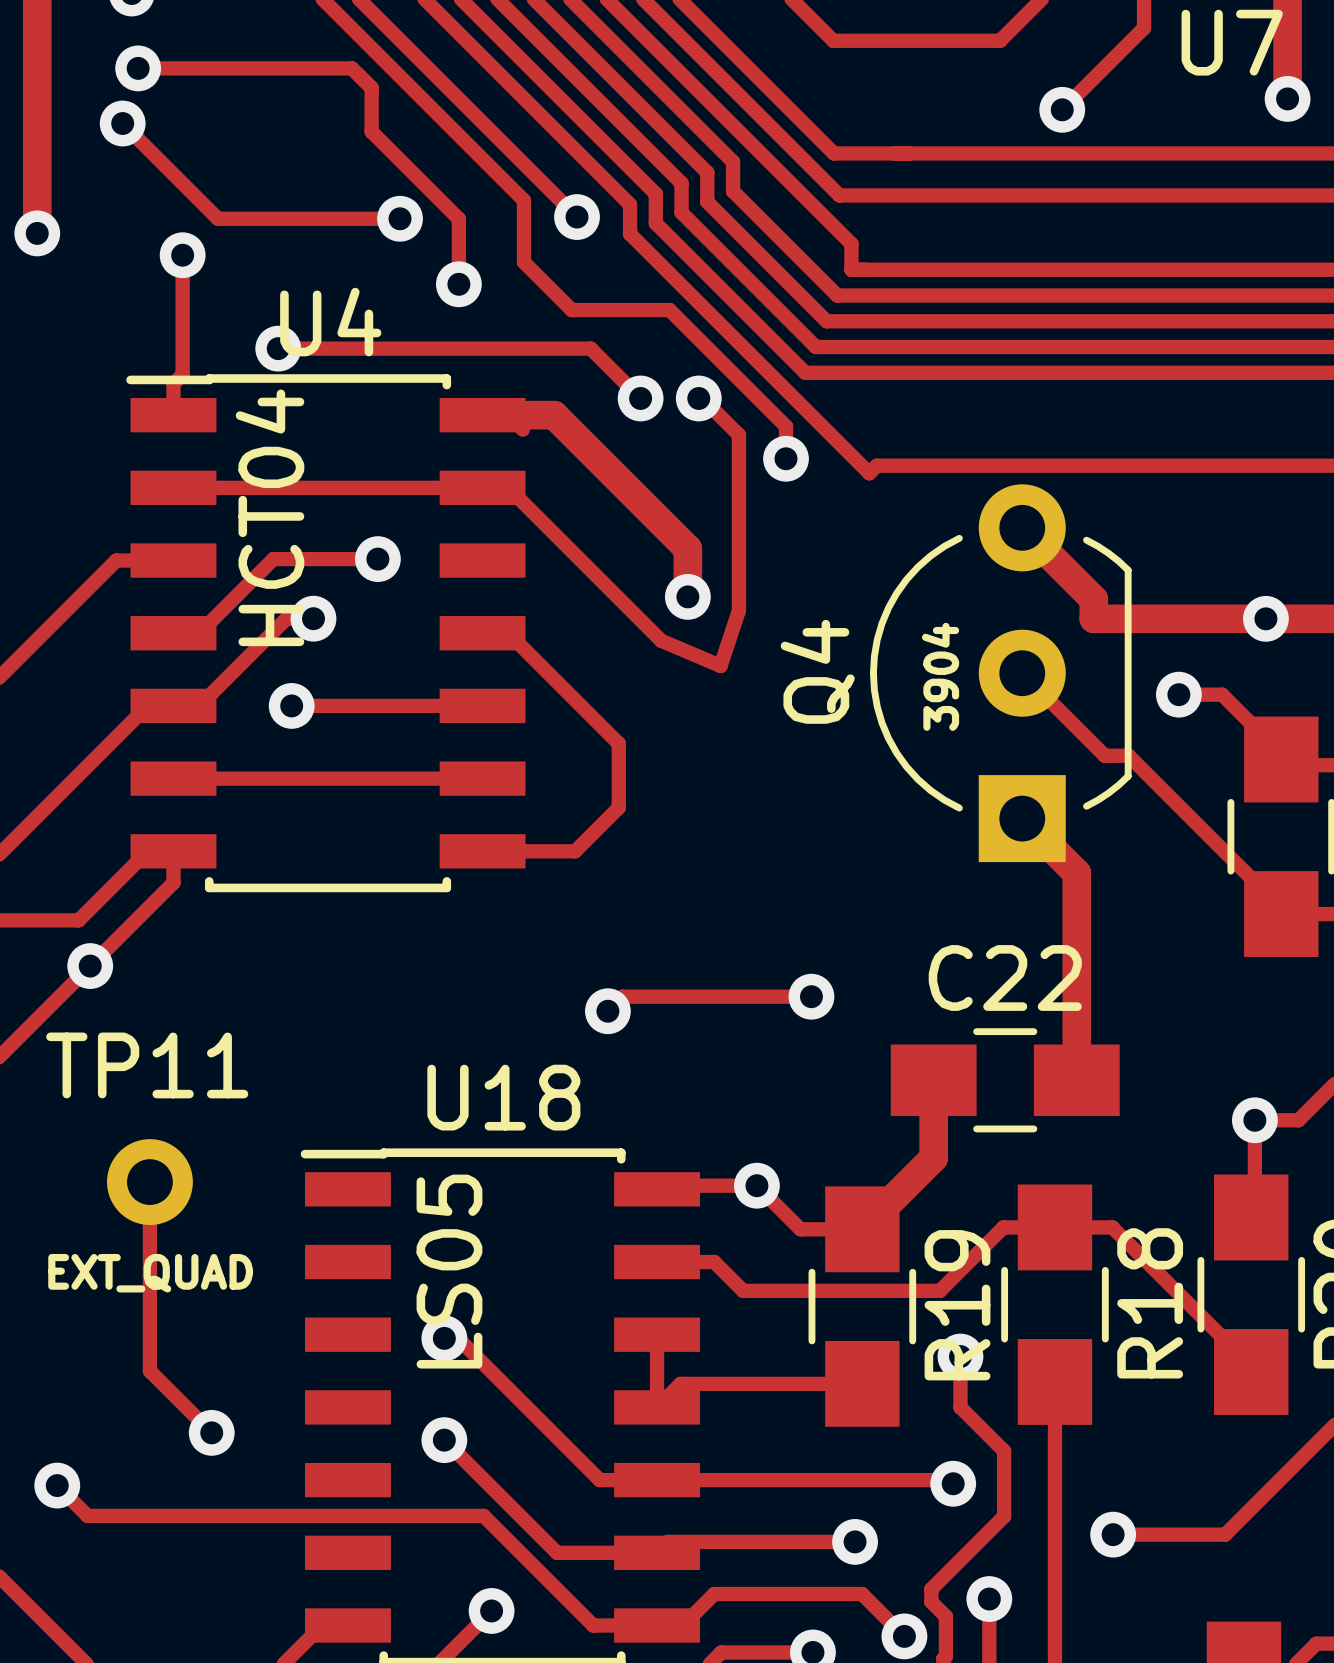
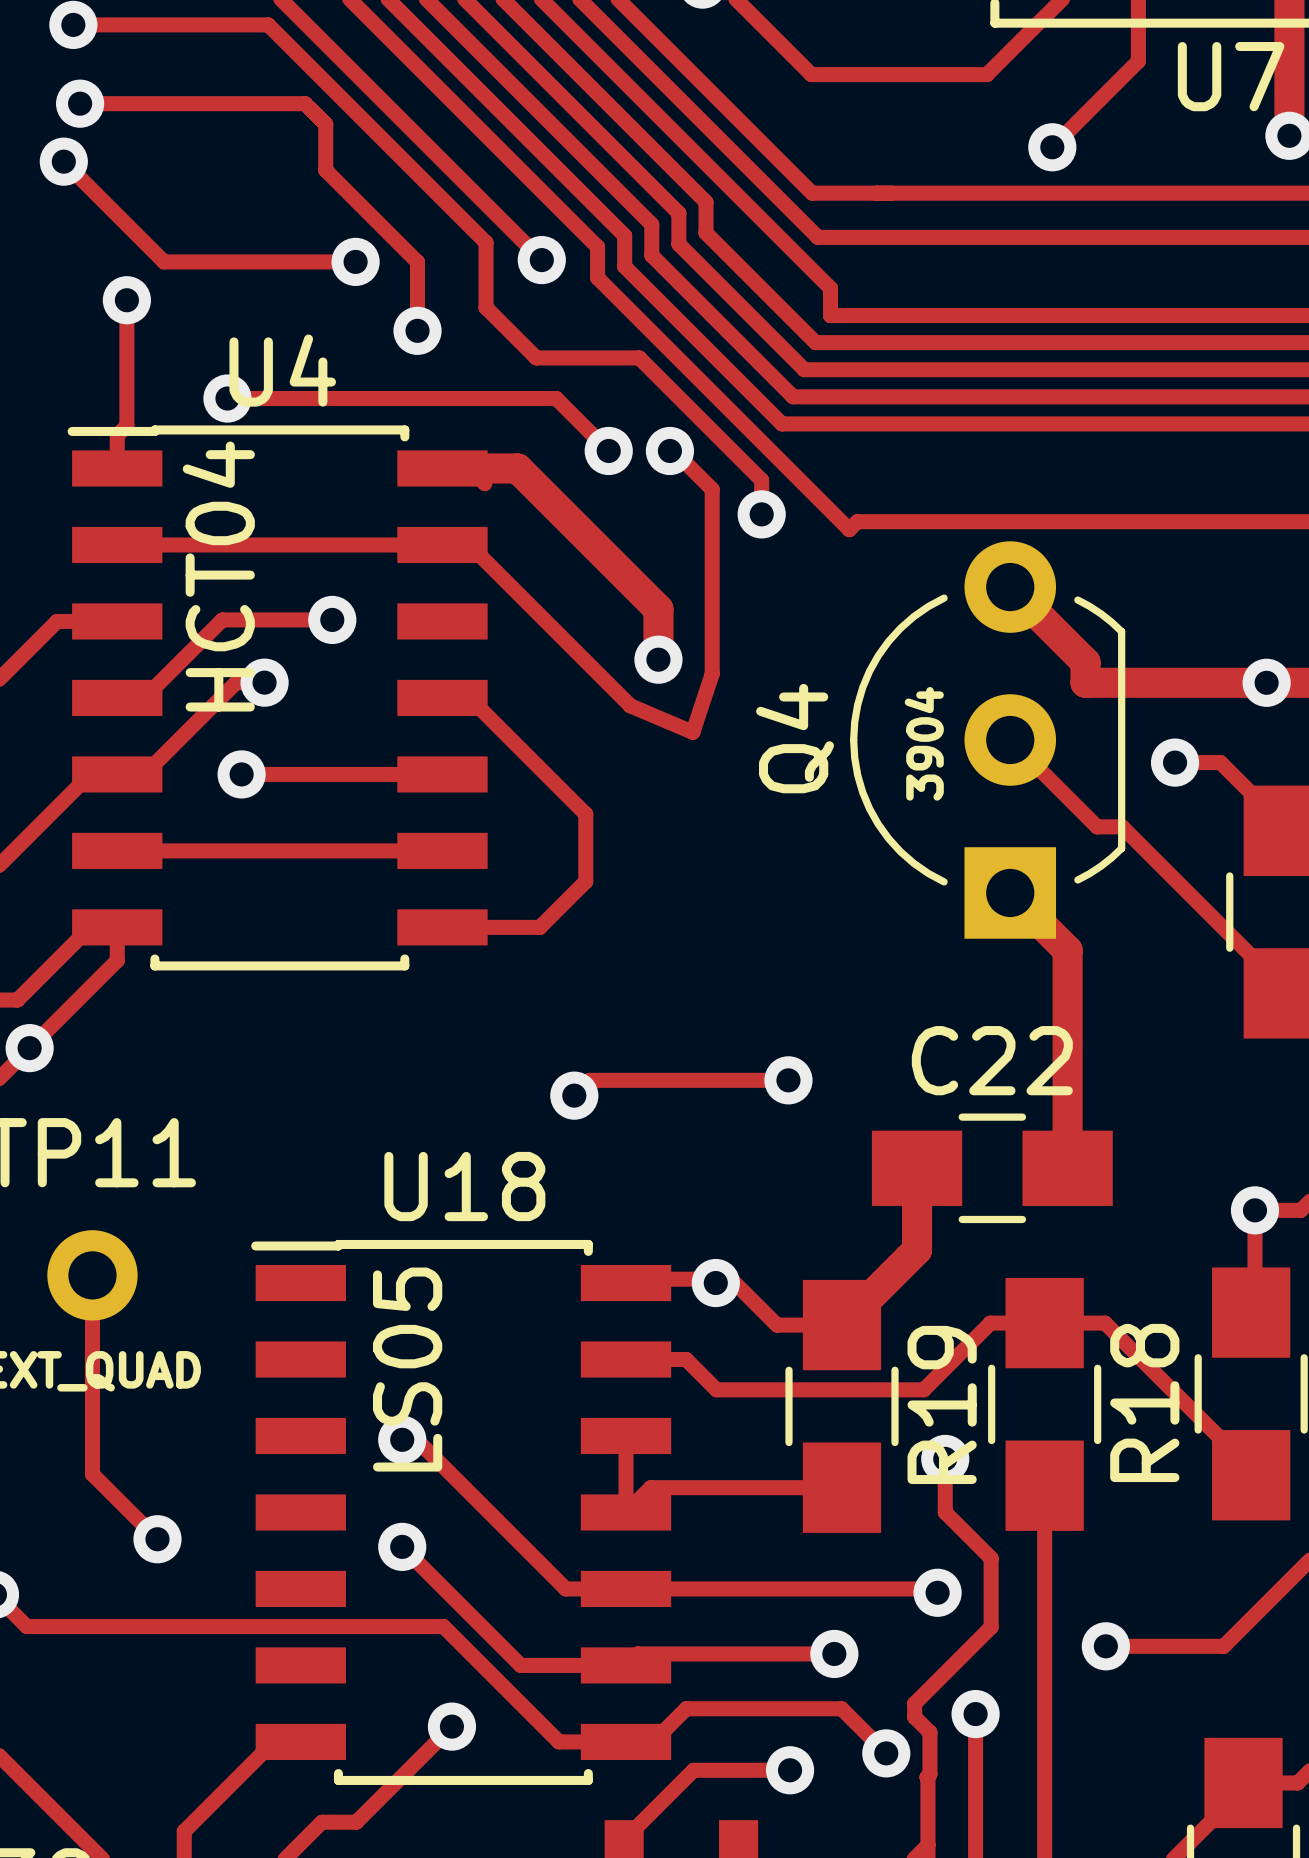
via position: (756, 1185) -> (715, 1283)

